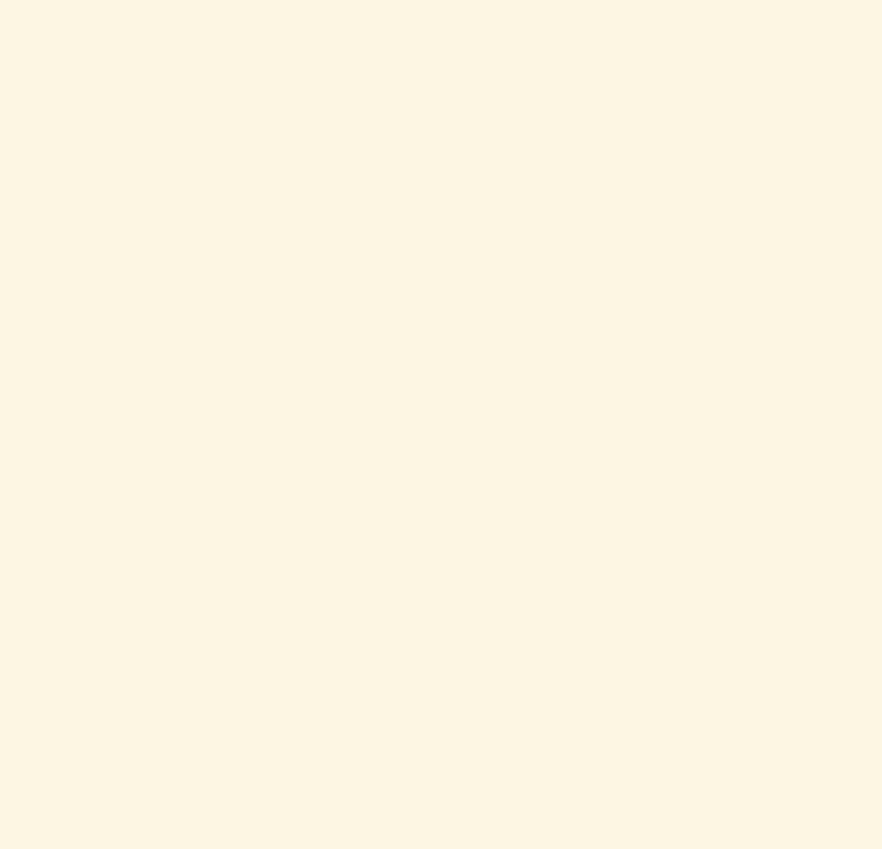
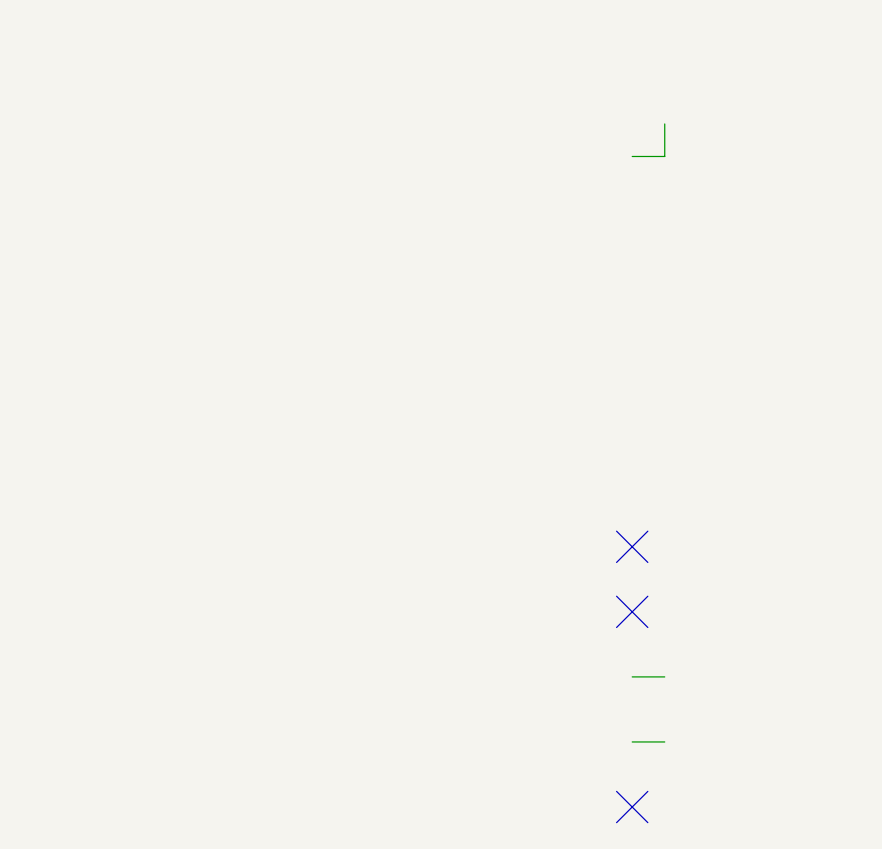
wire: none -> (664, 123) (664, 156) (632, 156)
no-connect mark: none -> (632, 546)
no-connect mark: none -> (632, 611)
wire: none -> (632, 676) (664, 676)
wire: none -> (632, 741) (664, 741)
no-connect mark: none -> (632, 807)

